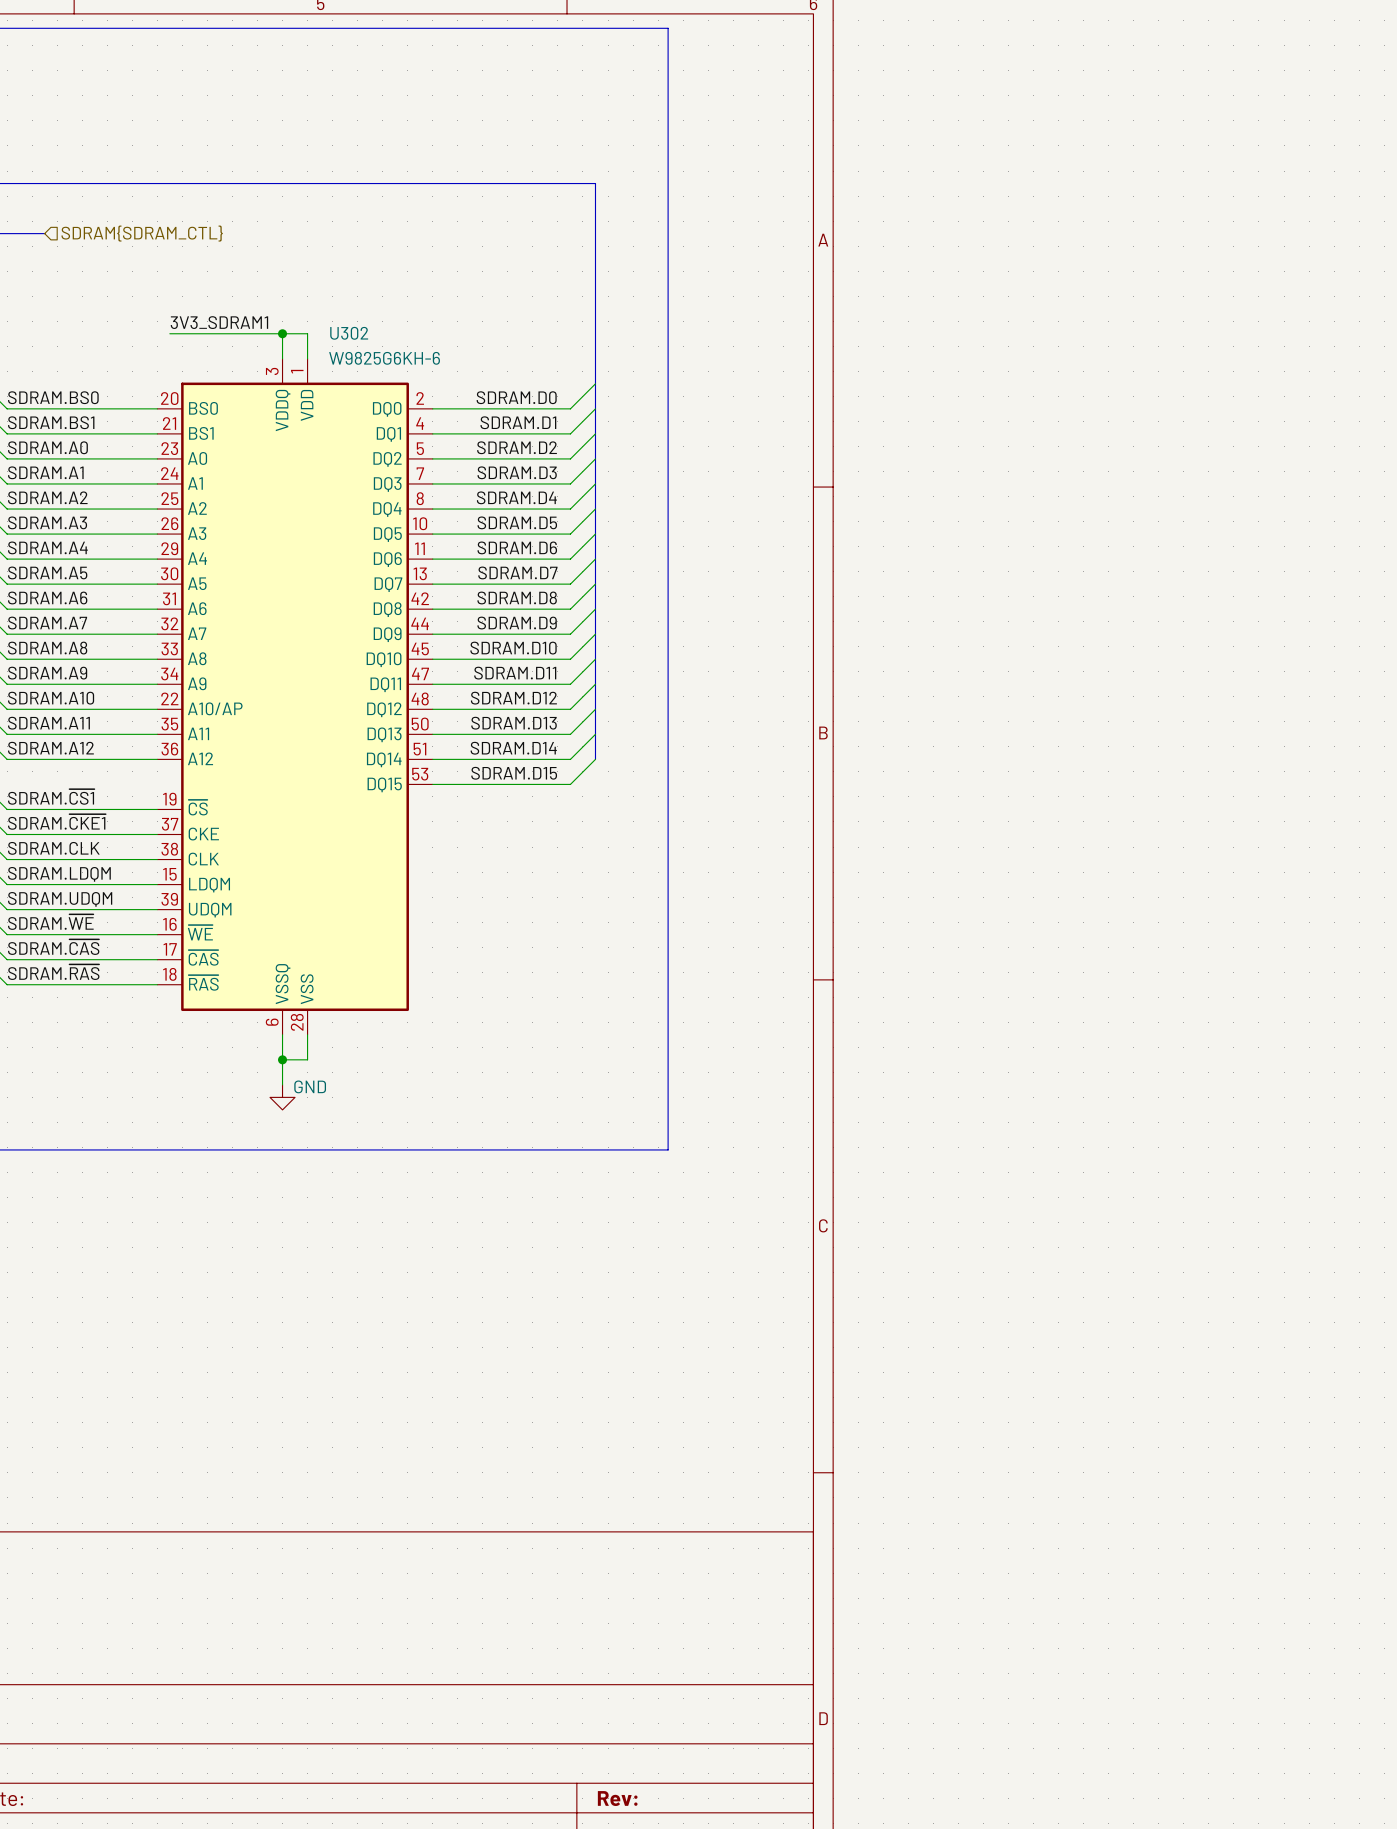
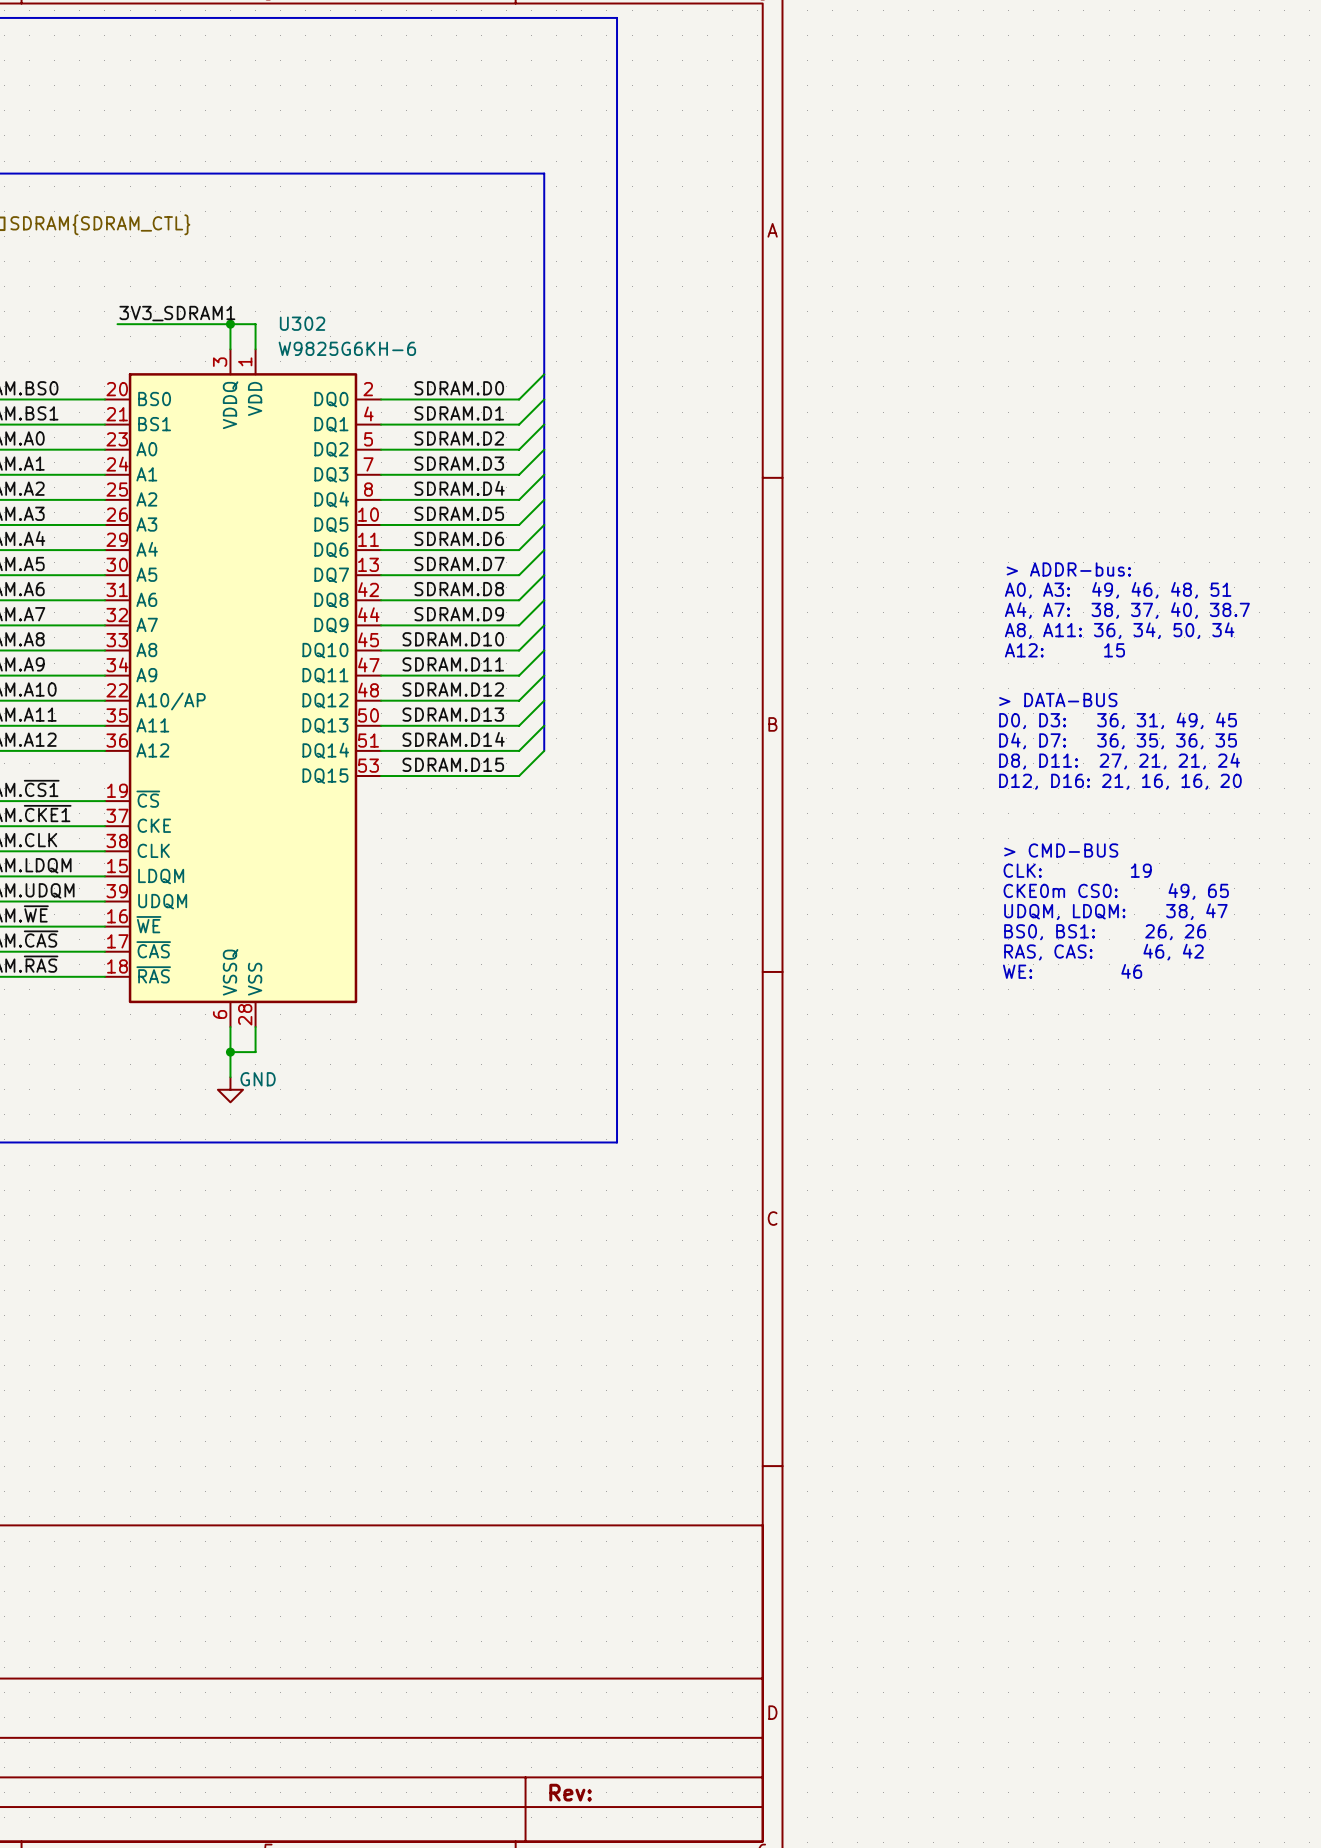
text: none -> > ADDR-bus: (1068, 569)
text: none -> A0, A3: 49, 46, 48, 51 (1118, 590)
text: none -> A4, A7: 38, 37, 40, 38.7 (1127, 610)
text: none -> A8, A11: 36, 34, 50, 34 (1119, 630)
text: none -> A12: 15 (1064, 650)
text: none -> > DATA-BUS (1058, 700)
text: none -> D0, D3: 36, 31, 49, 45 (1118, 720)
text: none -> D4, D7: 36, 35, 36, 35 (1118, 741)
text: none -> D8, D11: 27, 21, 21, 24 (1119, 761)
text: none -> D12, D16: 21, 16, 16, 20 (1120, 781)
text: none -> > CMD-BUS (1061, 850)
text: none -> CLK: 19 (1077, 870)
text: none -> CKE0m CS0: 49, 65 (1116, 891)
text: none -> UDQM, LDQM: 38, 47 (1115, 911)
text: none -> BS0, BS1: 26, 26 (1105, 932)
text: none -> RAS, CAS: 46, 42 (1103, 952)
text: none -> WE: 46 (1072, 971)

